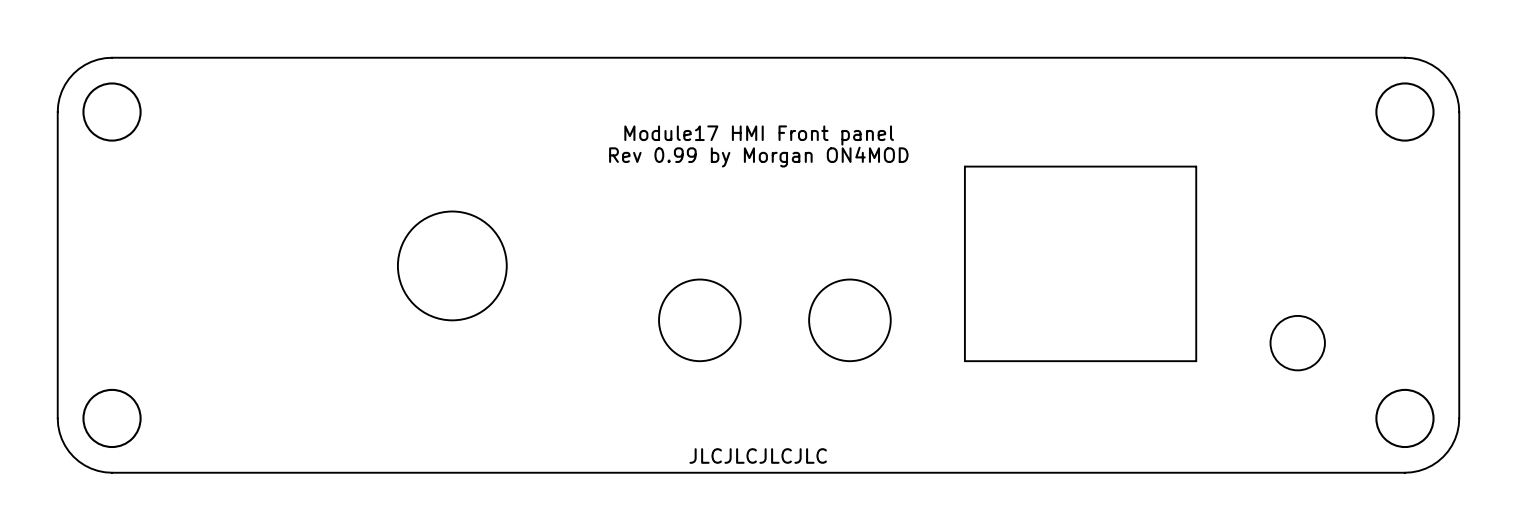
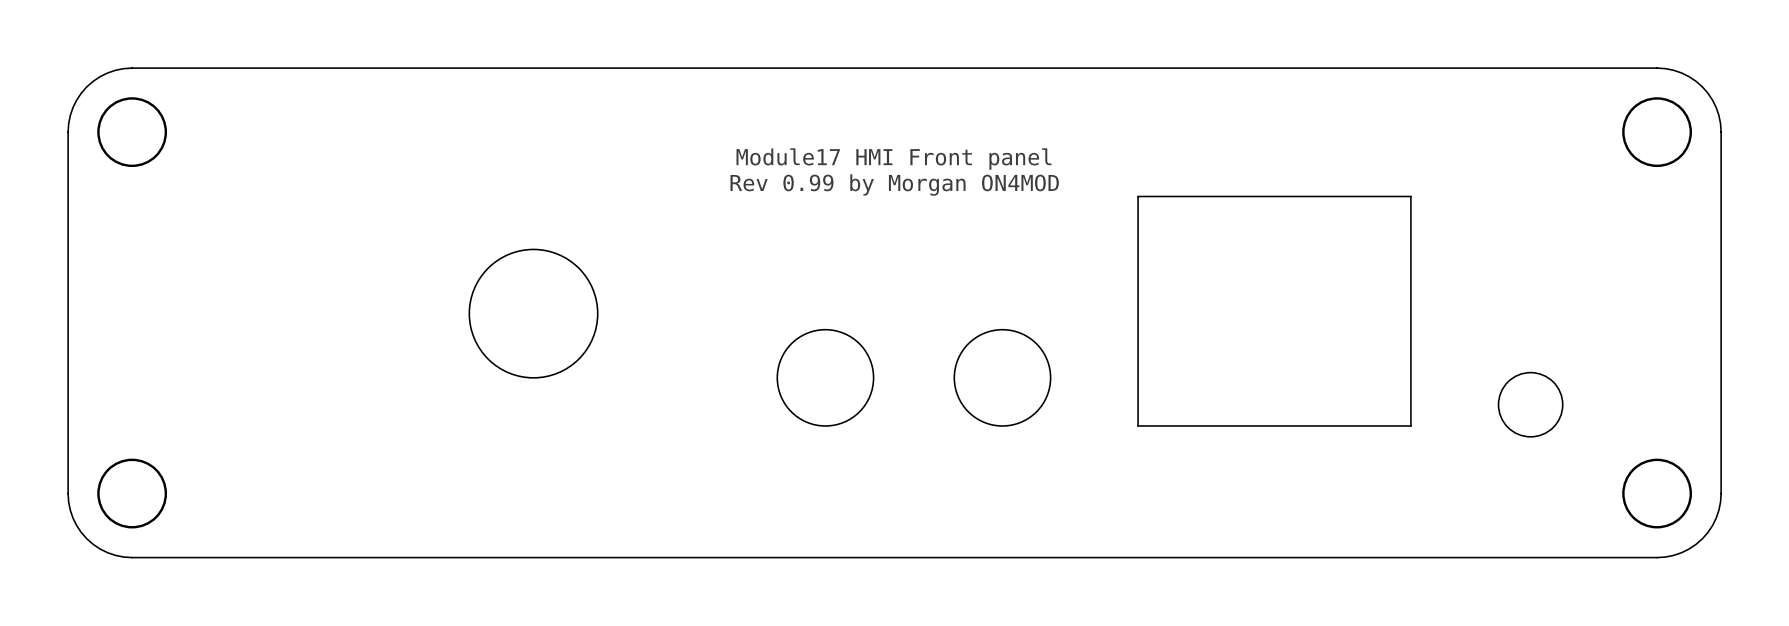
text: JLCJLCJLCJLC (758, 455) -> none

